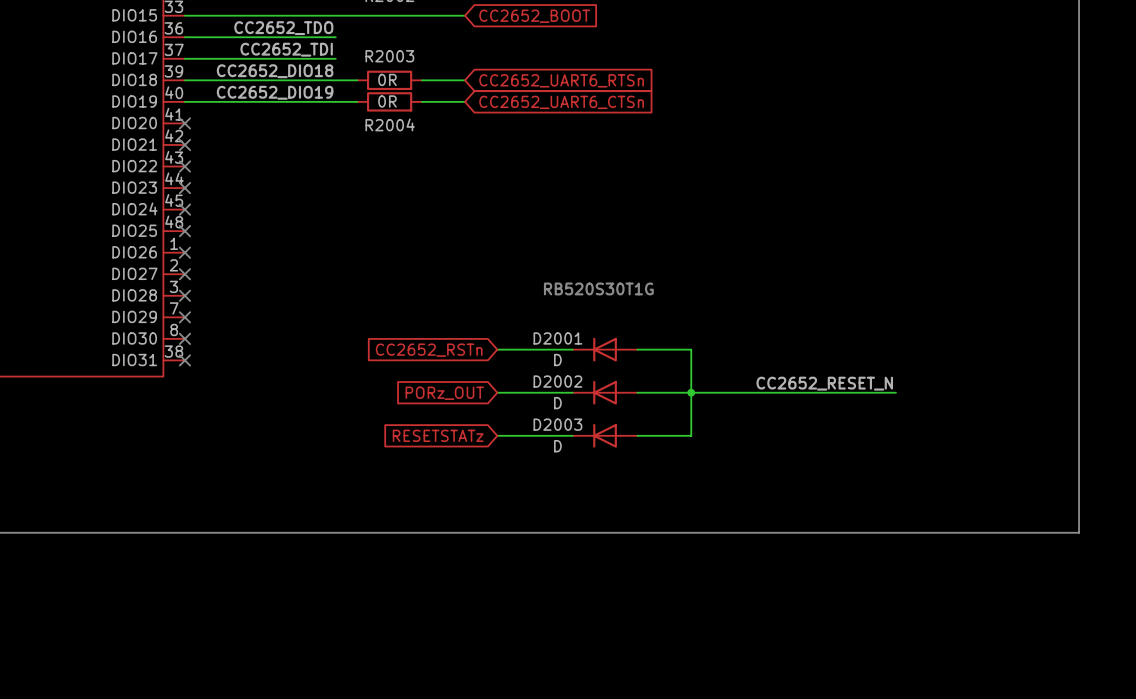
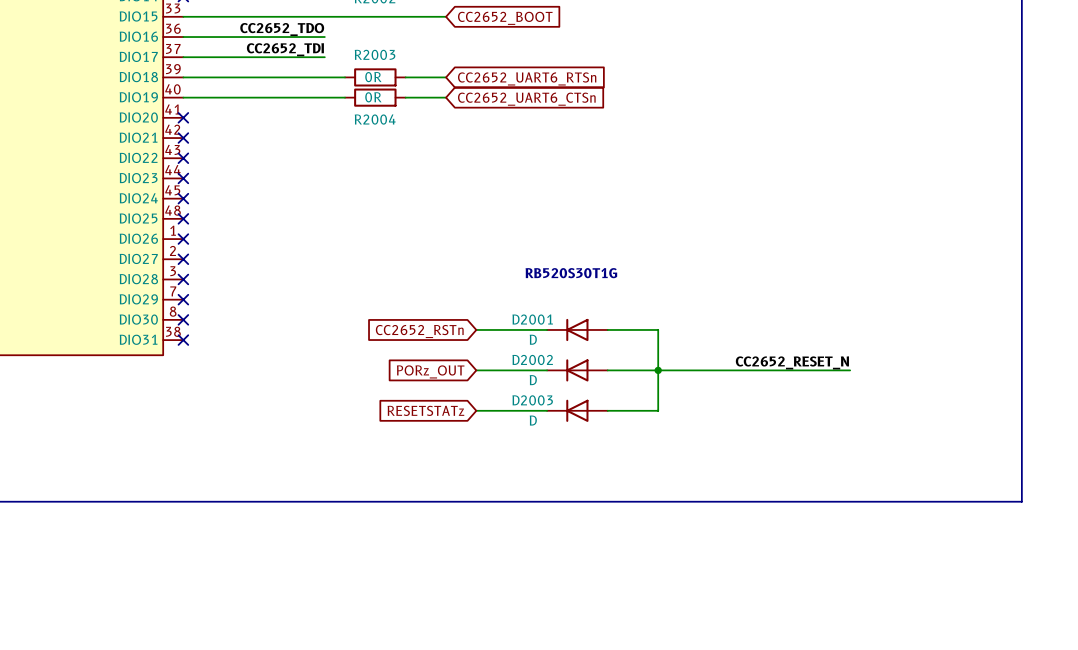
label: CC2652_DIO18 (275, 71) -> none
label: CC2652_DIO19 (275, 92) -> none

